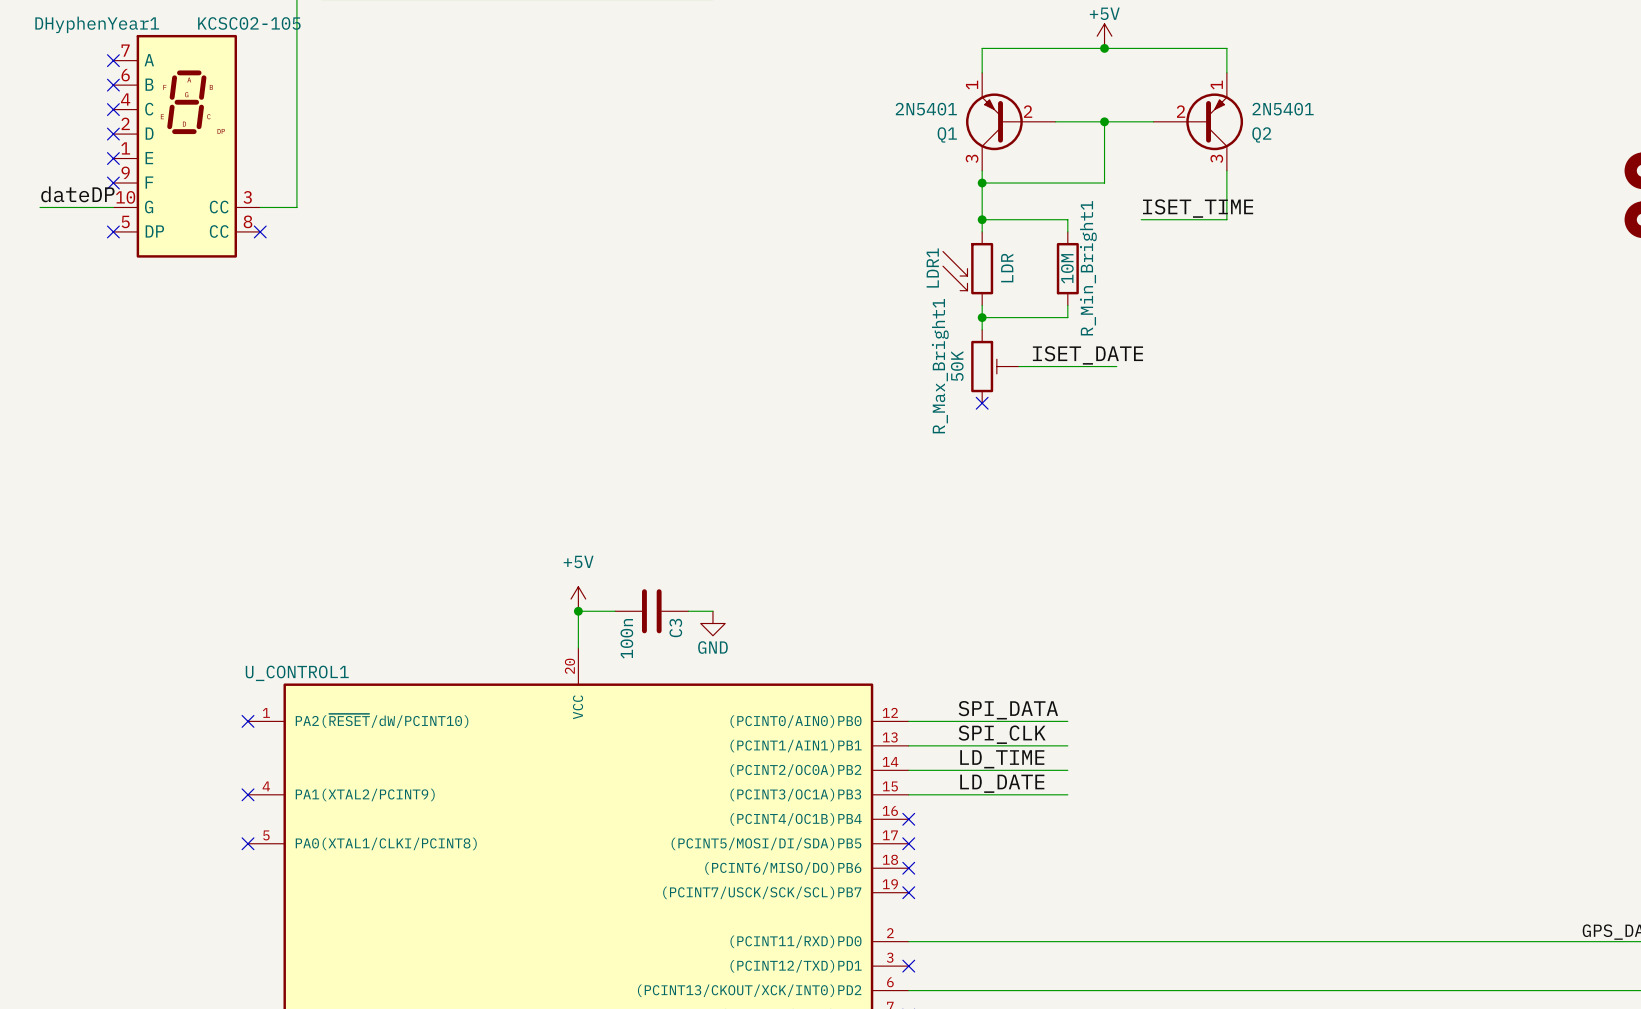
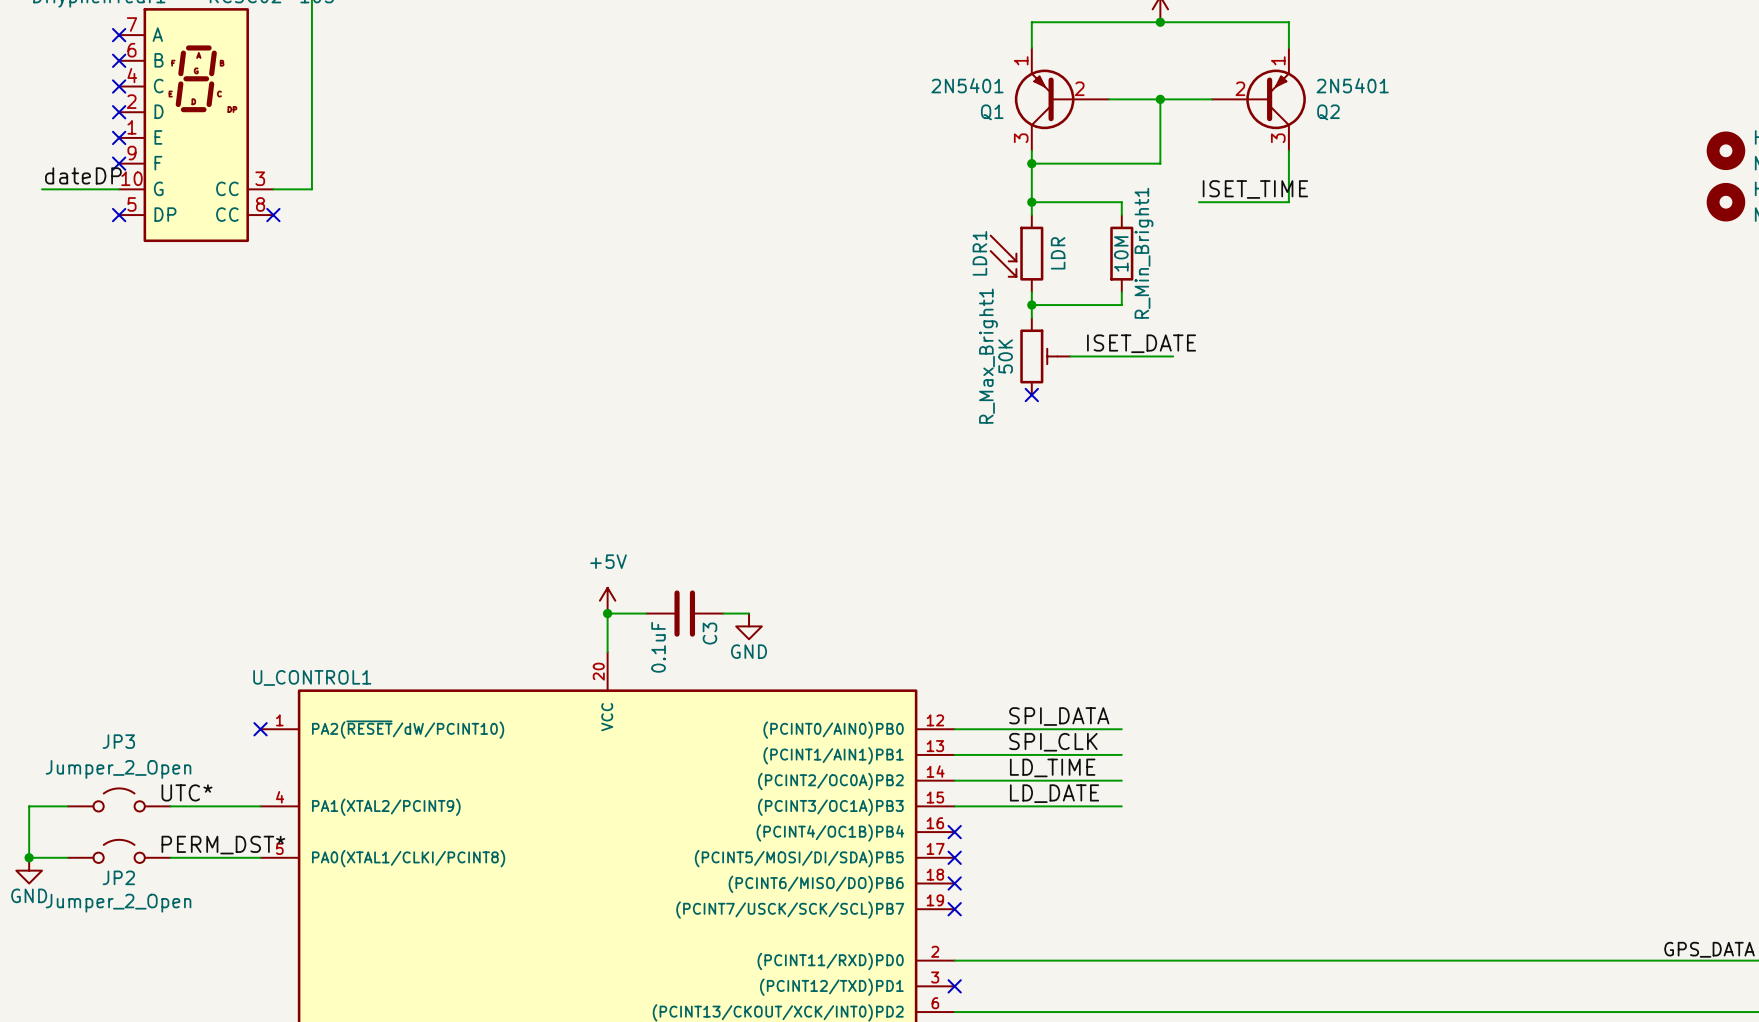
C3 value: 100n (626, 638) -> 0.1uF (658, 647)
label: none -> UTC* (187, 792)
JP3: none -> Jumper_2_Open (119, 799)
wire: none -> (67, 806) (29, 806) (29, 857) (67, 857)
wire: none -> (170, 806) (260, 806)
no-connect mark: (248, 794) -> none
label: none -> PERM_DST* (223, 845)
JP2: none -> Jumper_2_Open (119, 851)
junction: none -> (29, 857)
wire: none -> (170, 857) (260, 857)
no-connect mark: (248, 843) -> none
power symbol: none -> GND (29, 870)

